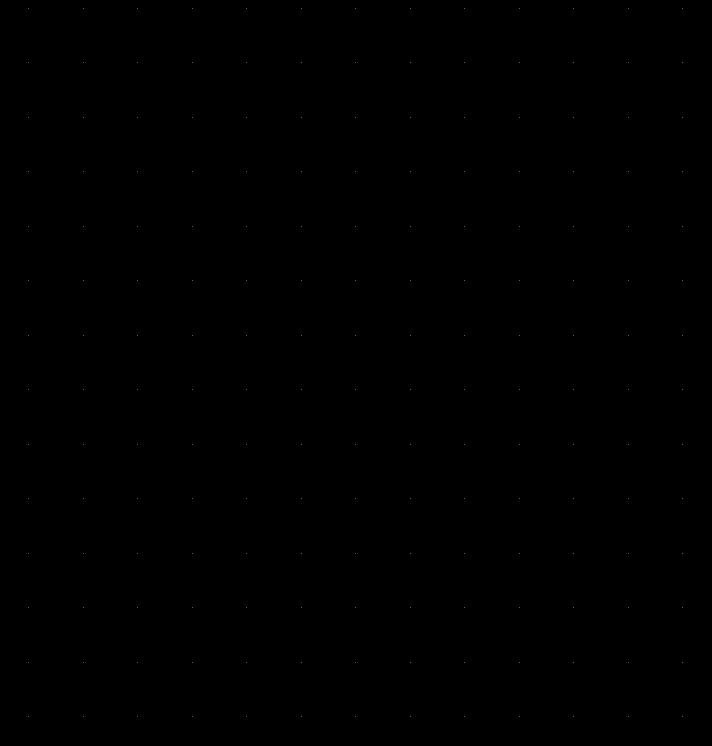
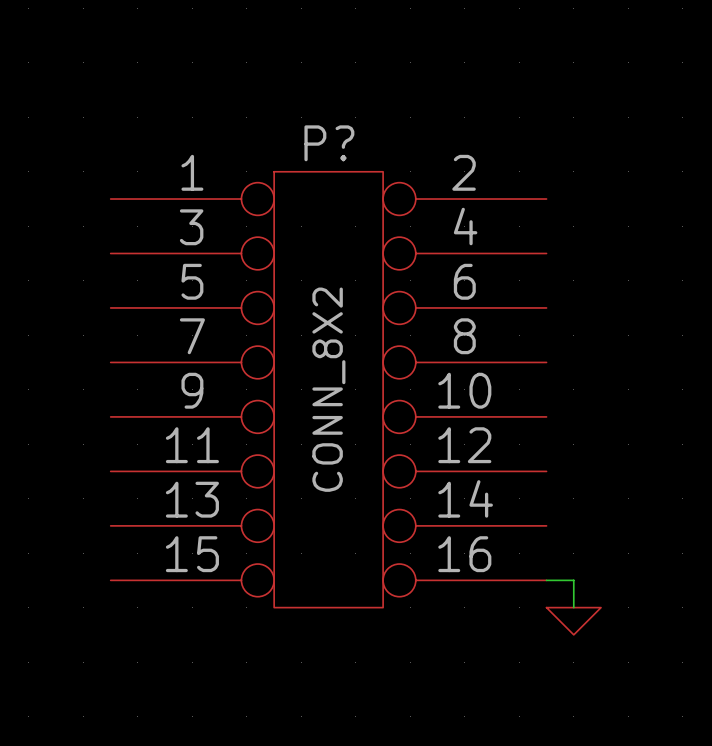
P?: none -> CONN_8X2 (328, 389)
wire: none -> (546, 580) (573, 580) (573, 607)
power symbol: none -> (573, 621)

